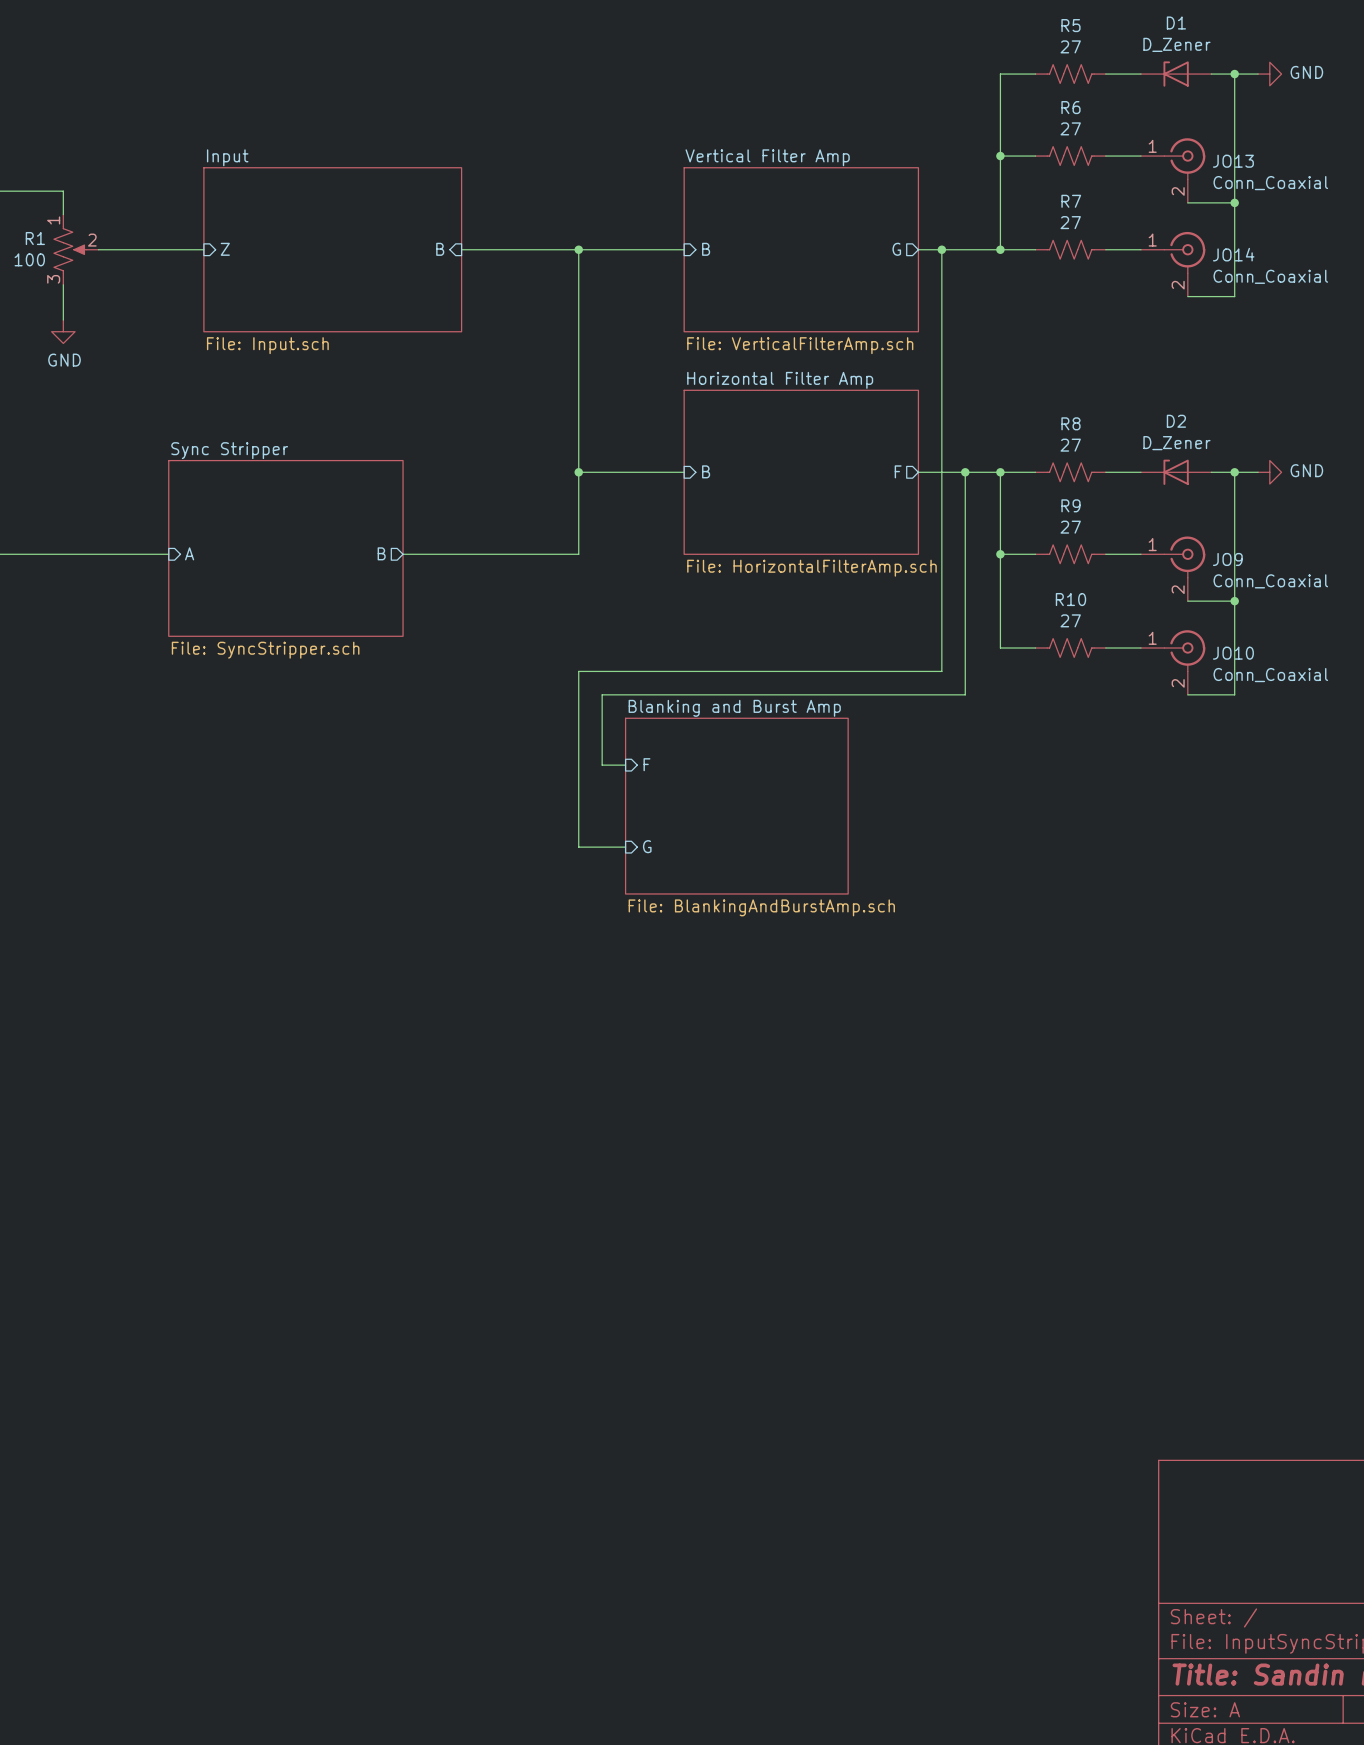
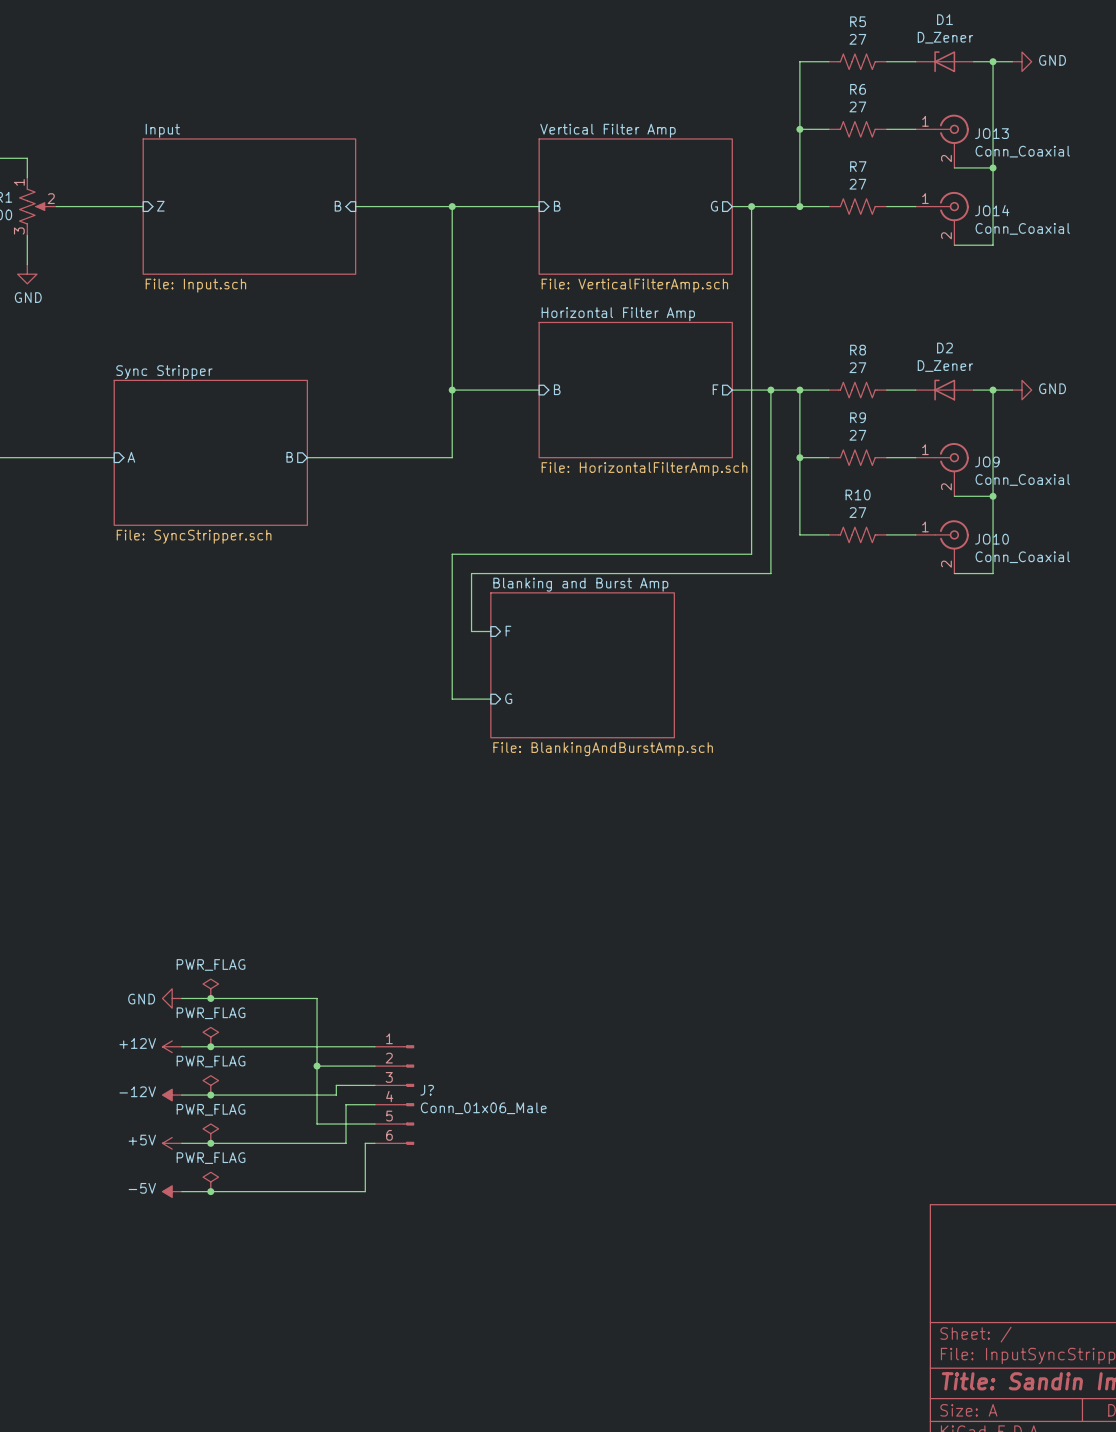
power symbol: none -> PWR_FLAG (210, 988)
power symbol: none -> GND (172, 998)
wire: none -> (181, 998) (317, 998) (317, 1124) (374, 1124)
junction: none -> (210, 998)
power symbol: none -> PWR_FLAG (210, 1037)
power symbol: none -> +12V (172, 1046)
wire: none -> (181, 1046) (374, 1046)
junction: none -> (210, 1046)
wire: none -> (317, 1066) (374, 1066)
junction: none -> (317, 1066)
power symbol: none -> PWR_FLAG (210, 1085)
wire: none -> (374, 1085) (336, 1085) (336, 1095) (181, 1095)
power symbol: none -> -12V (172, 1095)
junction: none -> (210, 1095)
J?: none -> Conn_01x06_Male (394, 1095)
wire: none -> (374, 1104) (346, 1104) (346, 1143) (181, 1143)
power symbol: none -> PWR_FLAG (210, 1133)
power symbol: none -> +5V (172, 1143)
junction: none -> (210, 1143)
wire: none -> (374, 1143) (365, 1143) (365, 1191) (181, 1191)
power symbol: none -> PWR_FLAG (210, 1181)
power symbol: none -> -5V (172, 1191)
junction: none -> (210, 1191)

